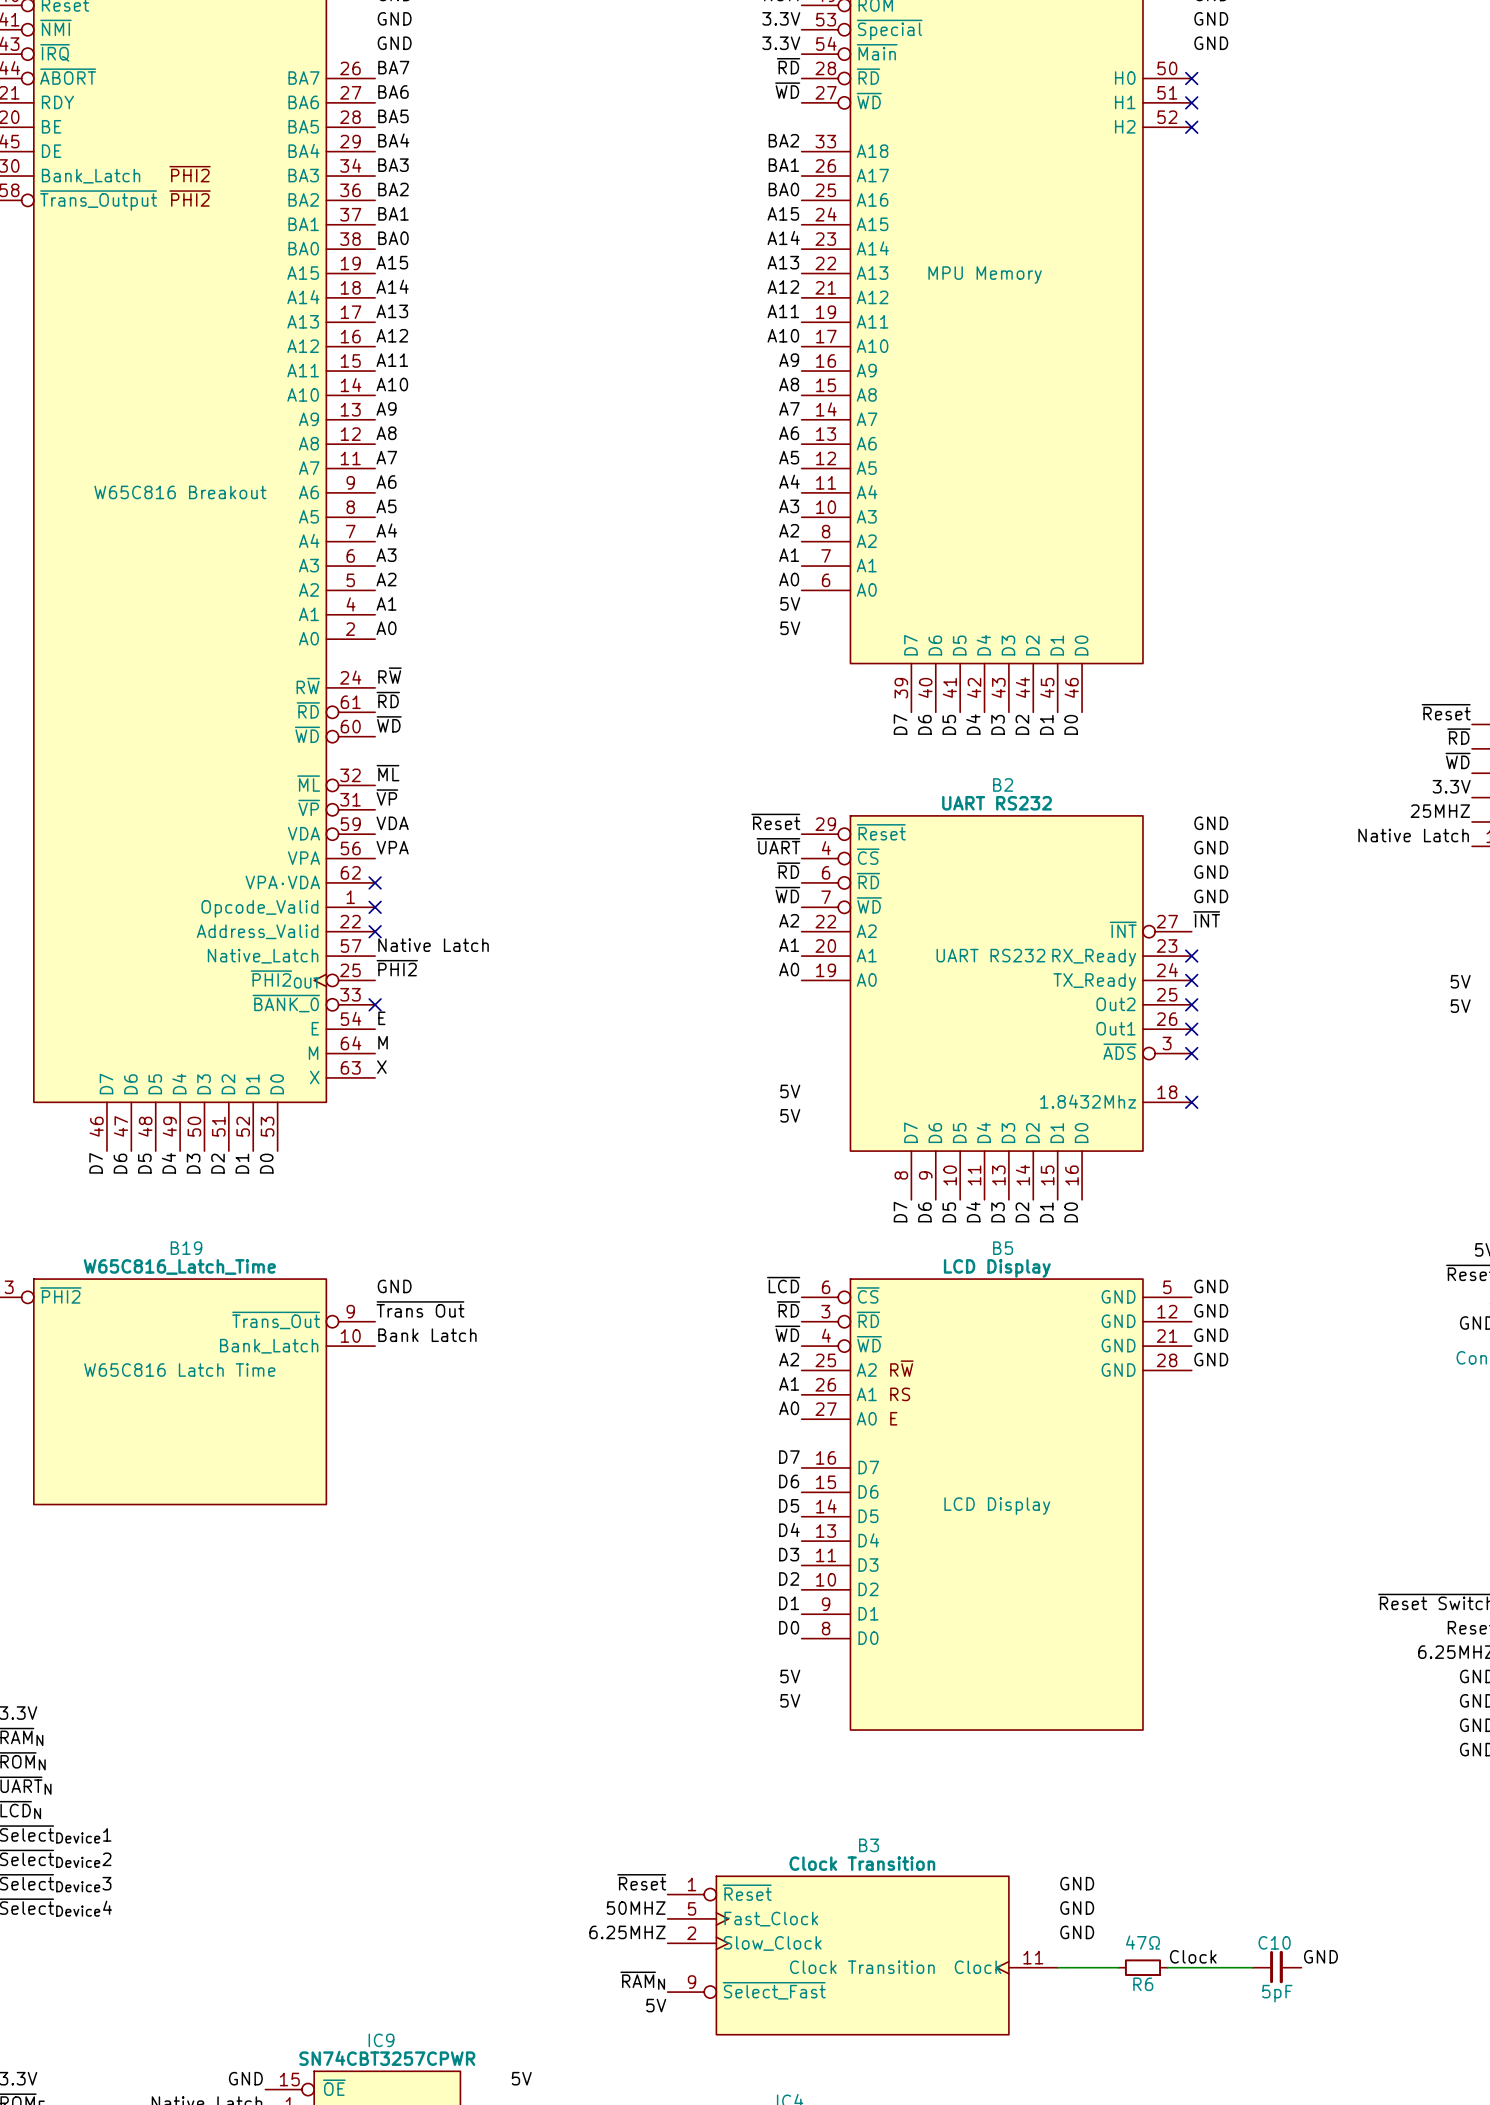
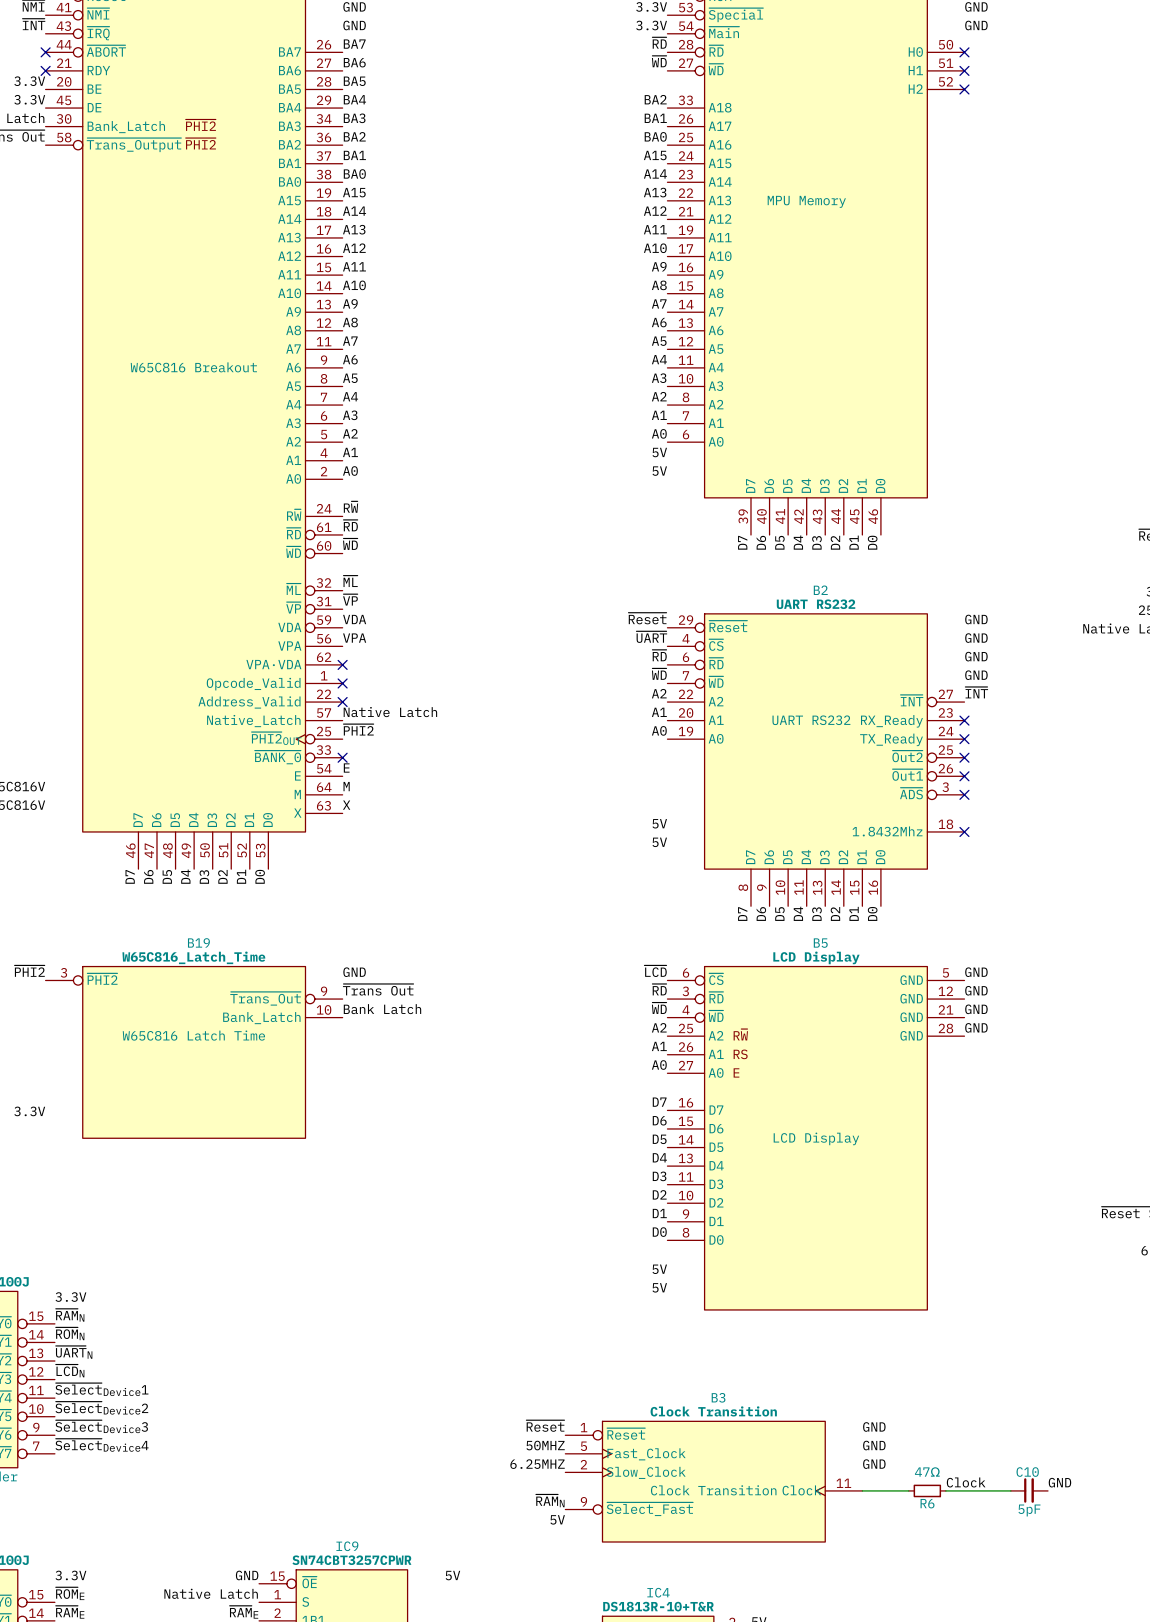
B2 symbol: [801, 815, 1192, 1200] -> [667, 613, 965, 907]

